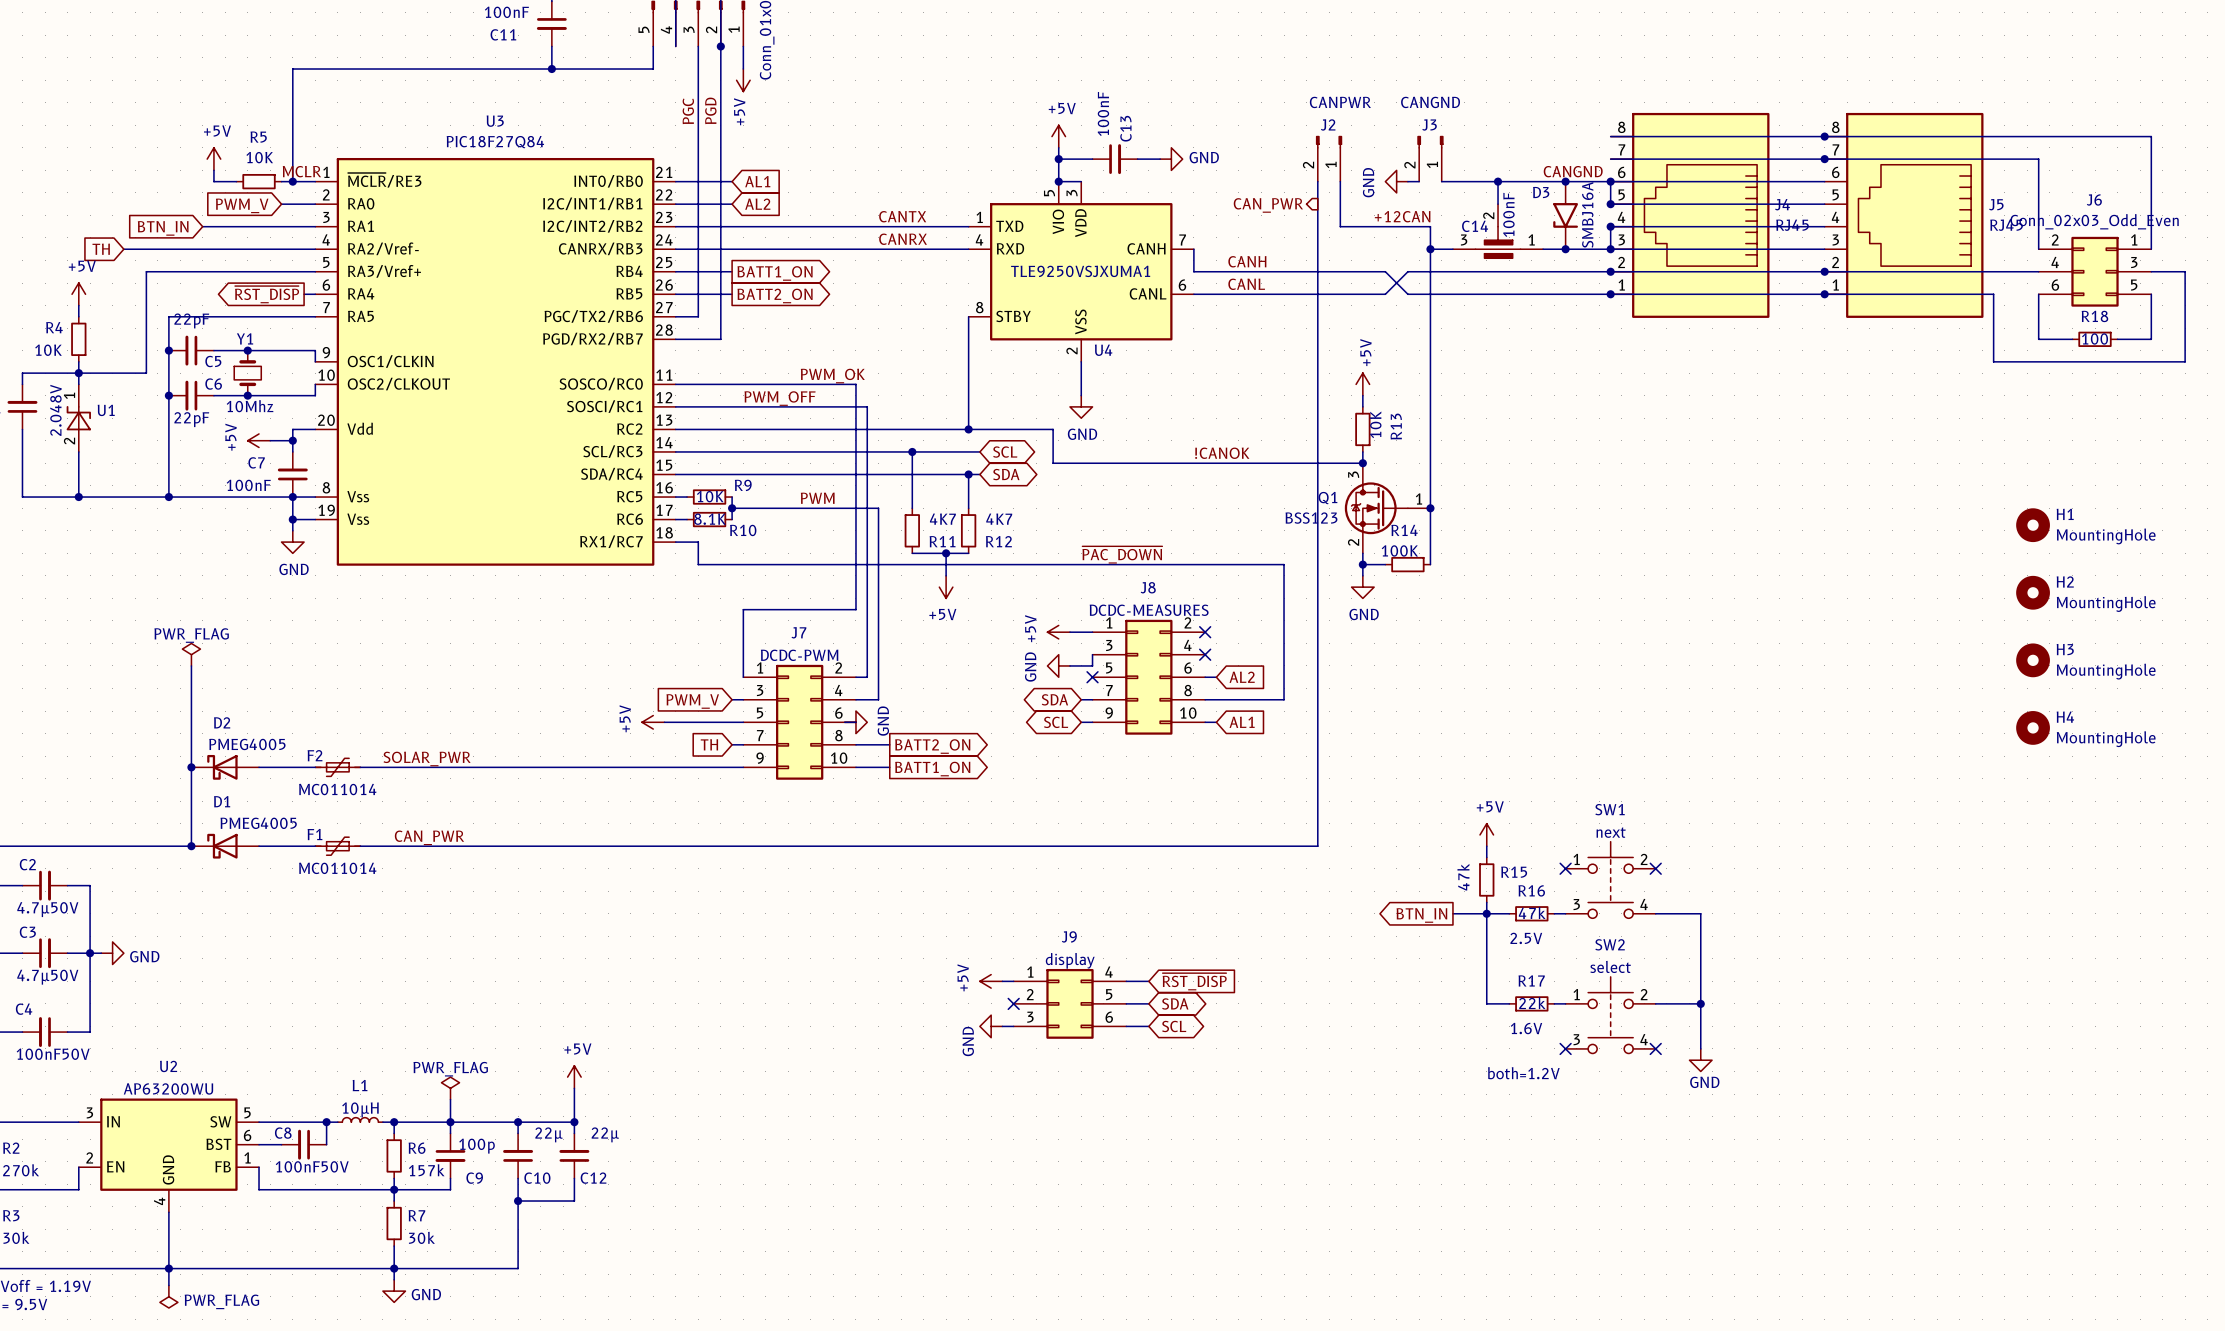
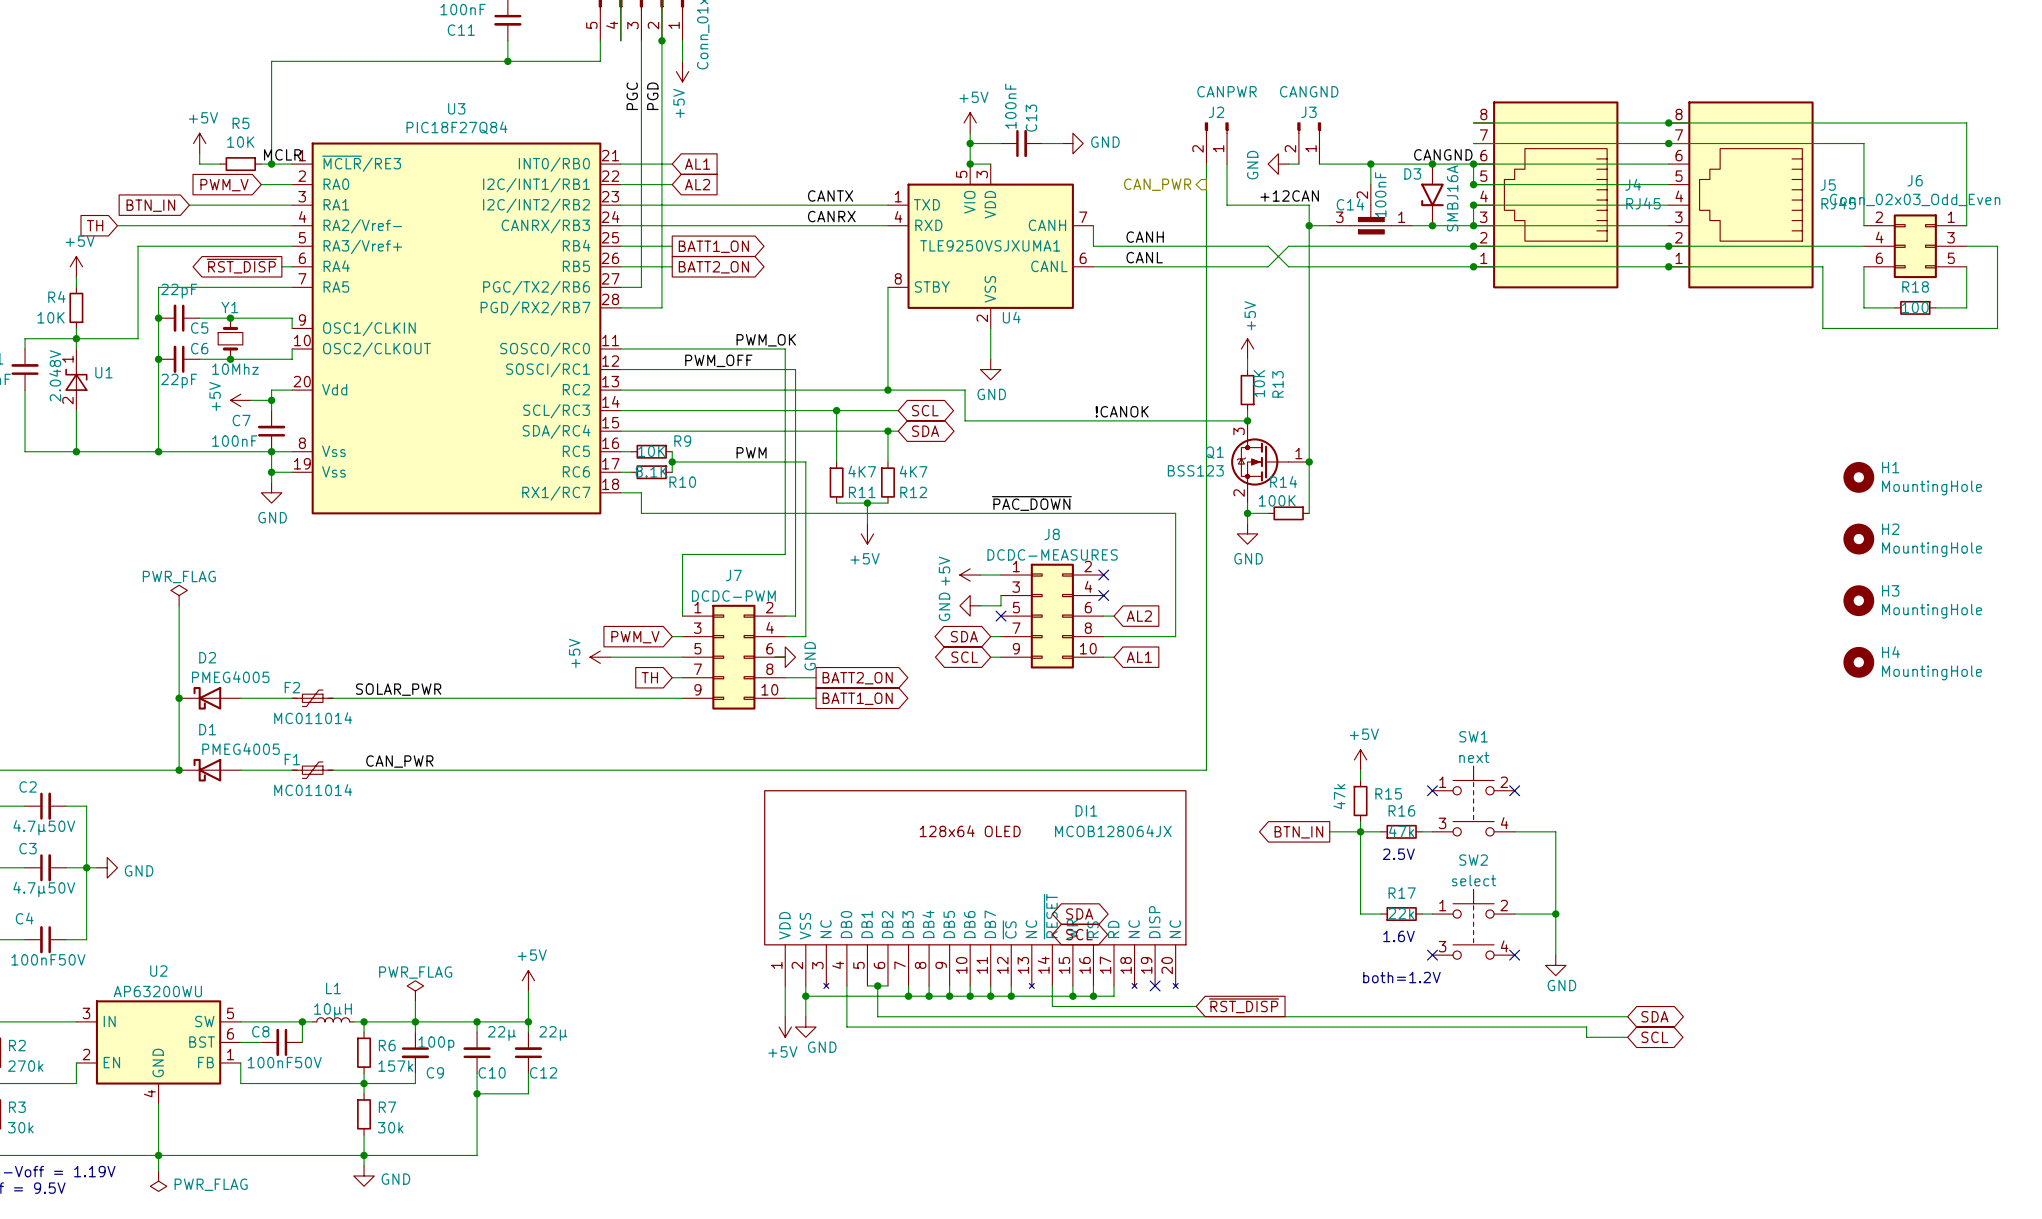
DI1: none -> MCOB128064JX (975, 889)
power symbol rotation: 0° (991, 981) -> 90° counterclockwise (785, 1027)
power symbol position: +5V (991, 981) -> +5V (785, 1027)
wire: (1002, 981) (1013, 981) -> none
wire: (1126, 981) (1148, 981) -> none
global label position: ~{RST_DISP} (1194, 981) -> ~{RST_DISP} (1244, 1005)
no-connect mark: (1013, 1003) -> none
J9: display (1070, 1003) -> none
wire: (1126, 1003) (1148, 1003) -> none
power symbol rotation: 0° (991, 1026) -> 90° counterclockwise (805, 1027)
power symbol position: GND (991, 1026) -> GND (805, 1027)
wire: (1002, 1026) (1013, 1026) -> none
wire: (1126, 1026) (1148, 1026) -> (867, 985) (887, 985)
wire: none -> (785, 985) (785, 1016)
wire: none -> (805, 985) (805, 1016)
wire: none -> (846, 985) (846, 1027) (1586, 1027) (1586, 1037) (1627, 1037)
wire: none -> (877, 985) (877, 1016) (1627, 1016)
junction: none -> (877, 985)
wire: none -> (908, 985) (908, 996)
wire: none -> (929, 985) (929, 996)
wire: none -> (949, 985) (949, 996)
wire: none -> (970, 985) (970, 996)
wire: none -> (990, 985) (990, 996)
wire: none -> (1011, 985) (1011, 996)
wire: none -> (1052, 985) (1052, 1006) (1196, 1006)
wire: none -> (1072, 985) (1072, 996)
wire: none -> (1093, 985) (1093, 996)
wire: none -> (1114, 985) (1114, 996) (805, 996)
no-connect mark: none -> (1155, 985)
junction: none -> (805, 996)
junction: none -> (908, 996)
junction: none -> (929, 996)
junction: none -> (949, 996)
junction: none -> (970, 996)
junction: none -> (990, 996)
junction: none -> (1011, 996)
junction: none -> (1072, 996)
junction: none -> (1093, 996)
global label: none -> SDA (1654, 1016)
global label: none -> SCL (1654, 1037)

